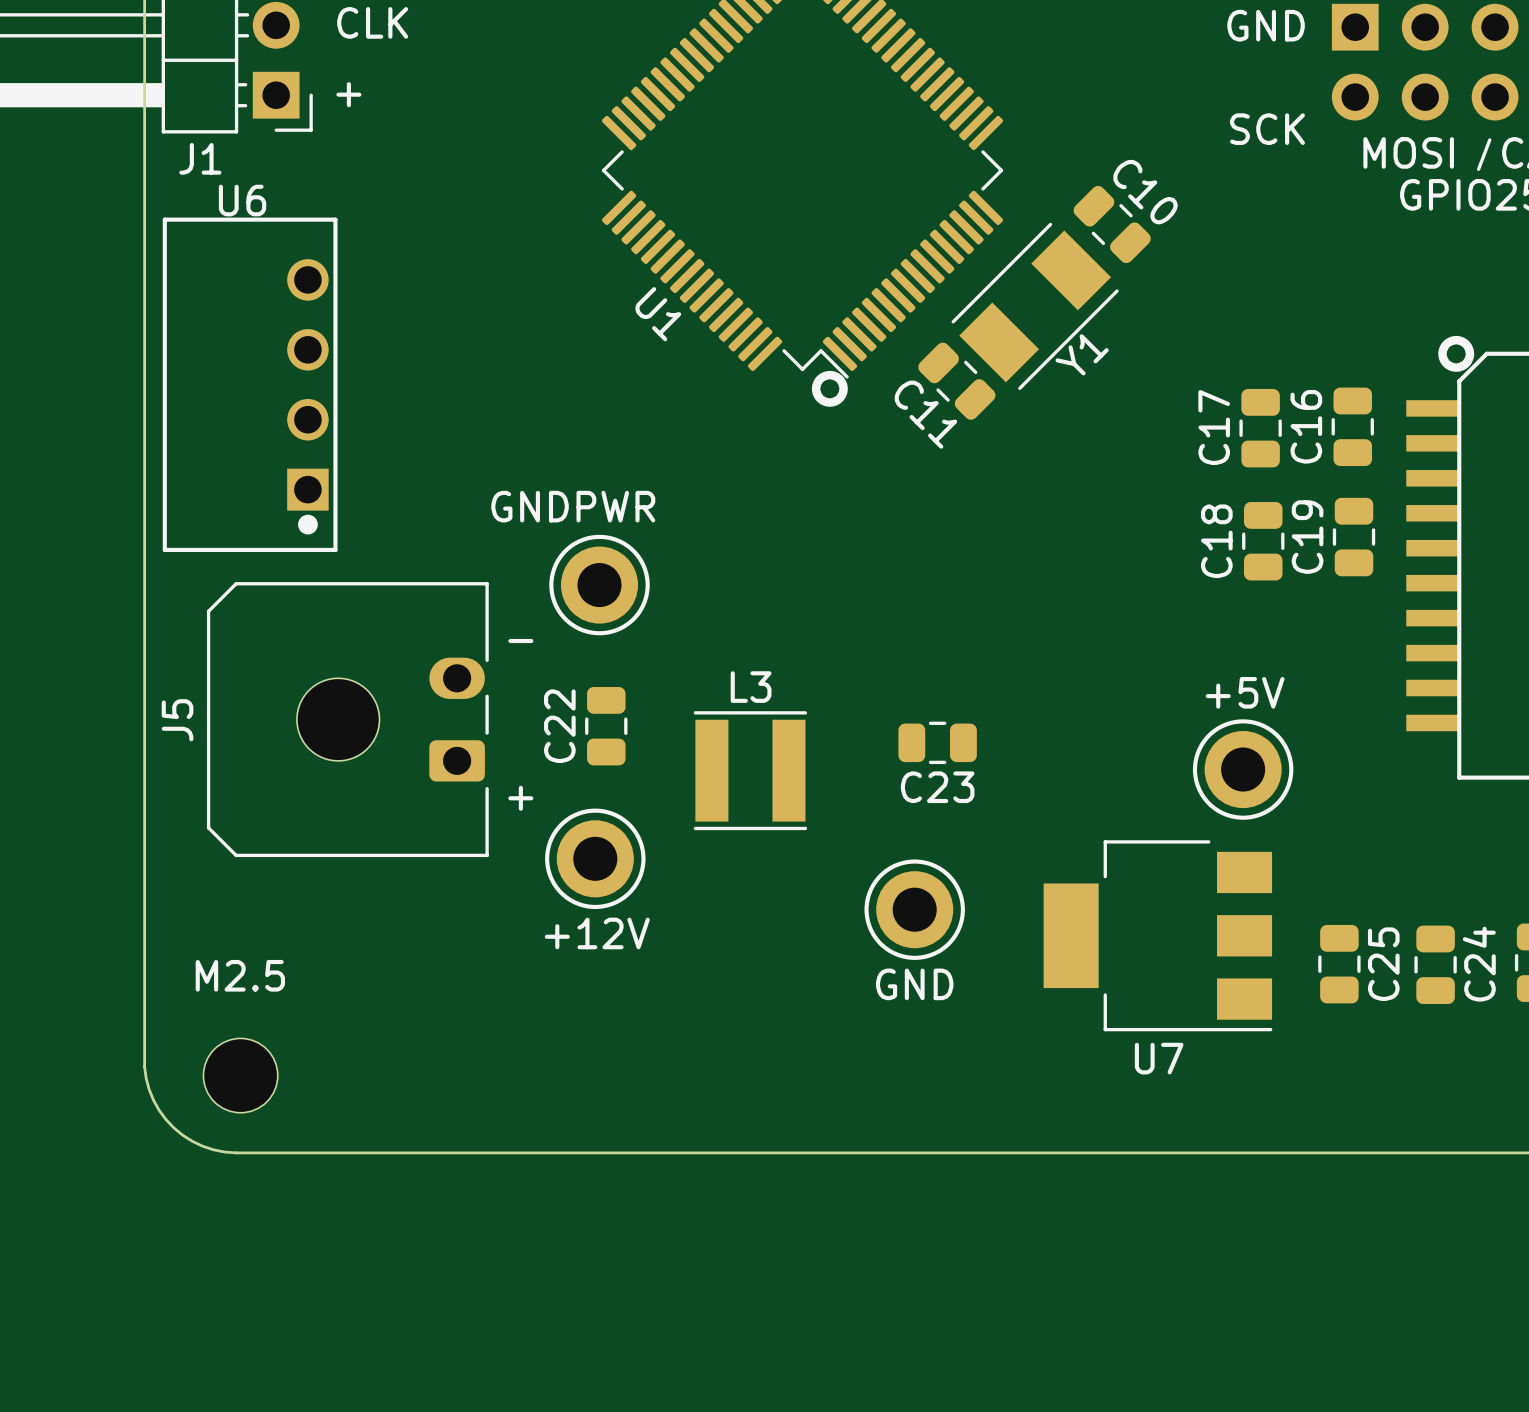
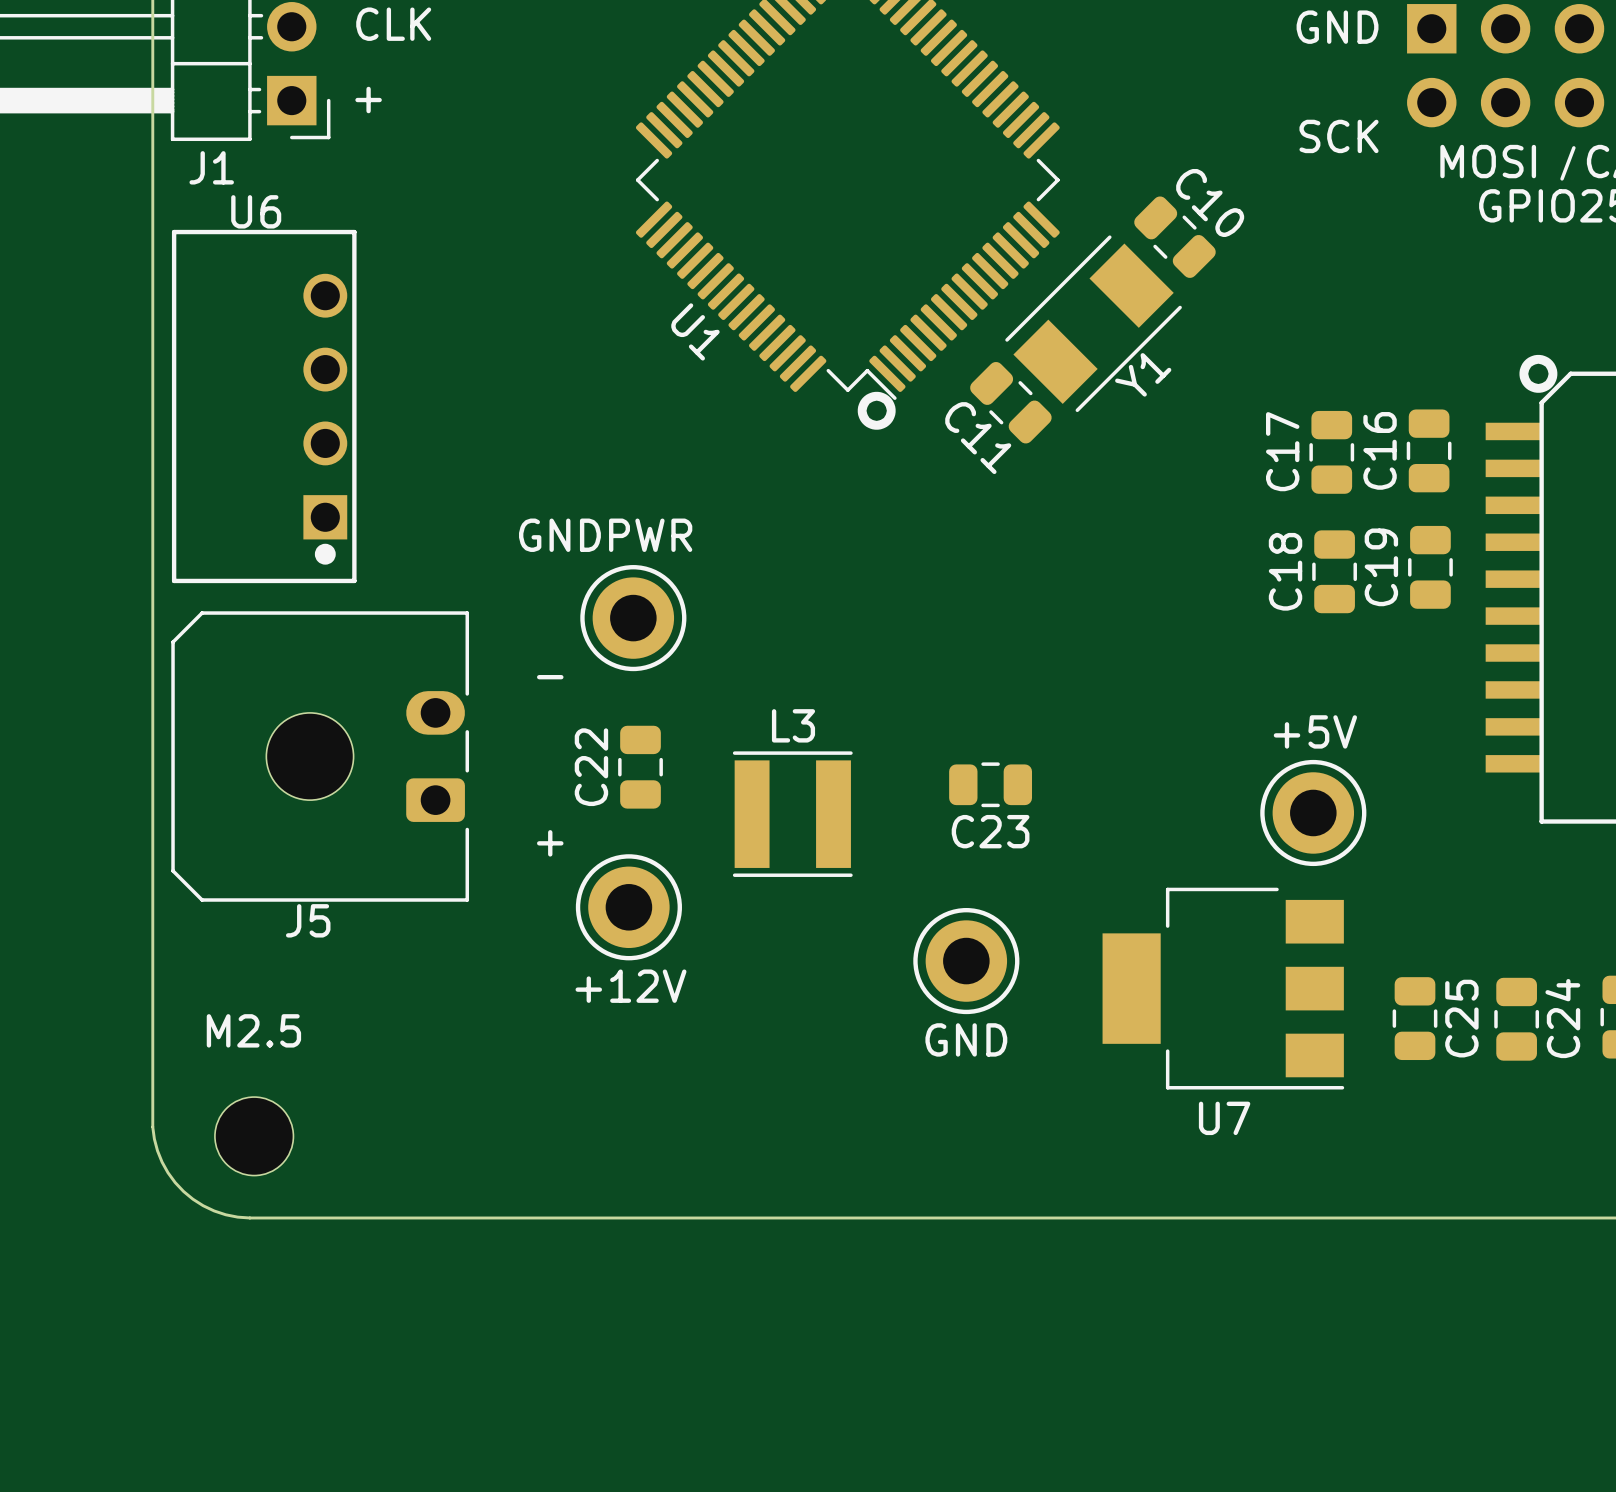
J5 position: (347, 719) -> (320, 756)
J5 name rotation: 0° (177, 720) -> 90° clockwise (308, 920)
J5 name position: J5 (177, 720) -> J5 (308, 920)

